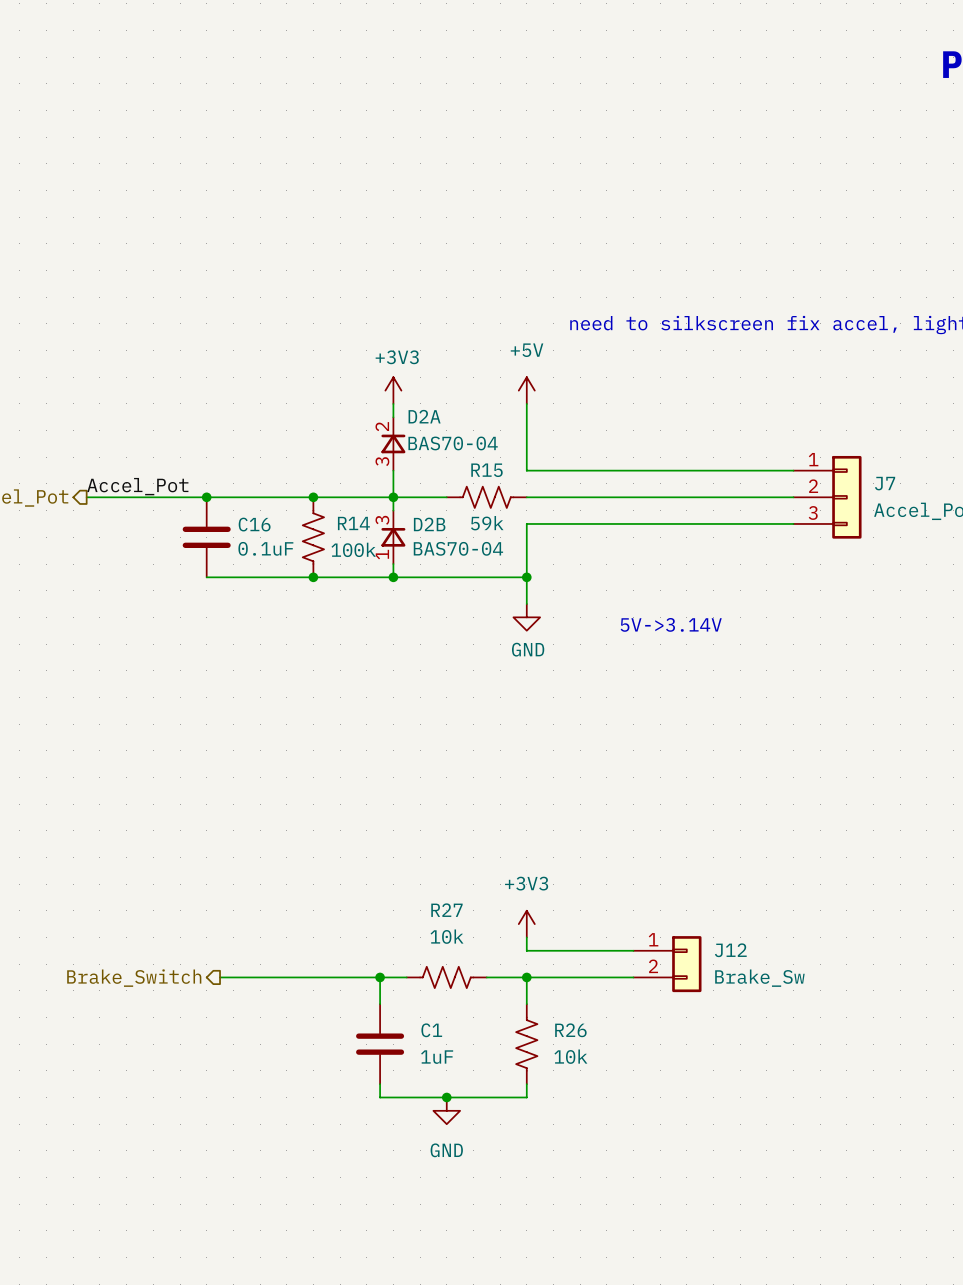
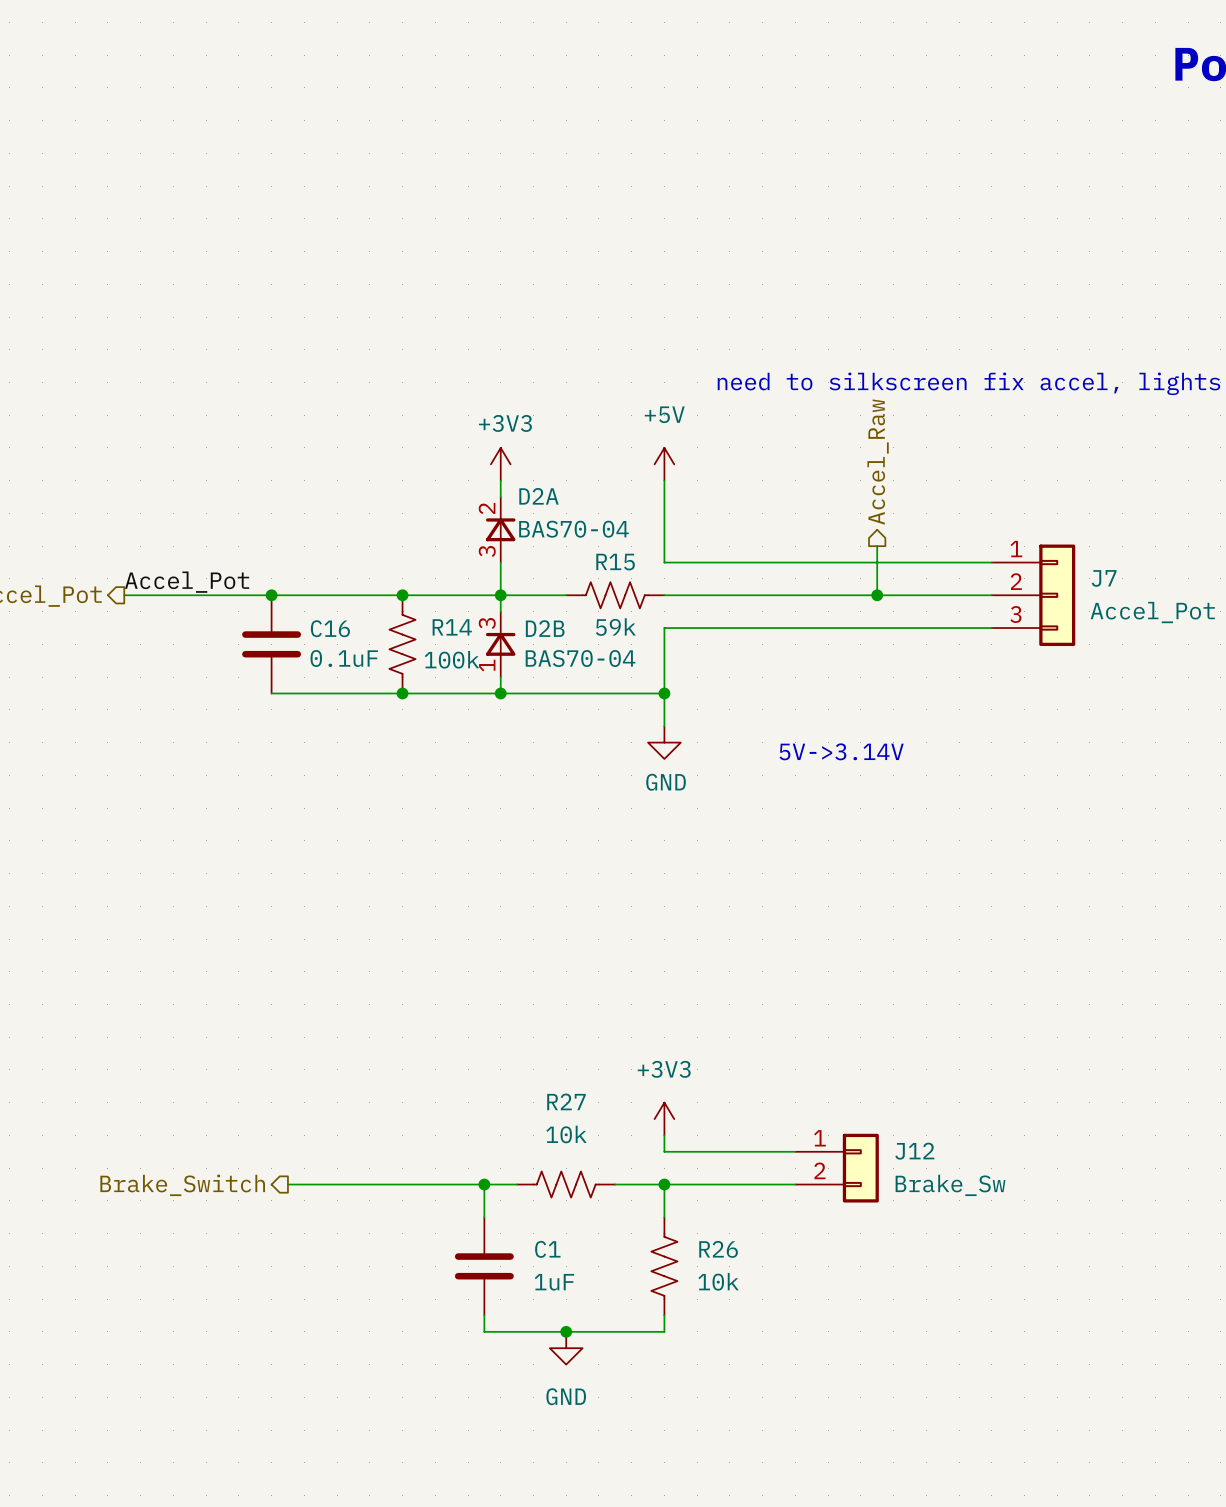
hierarchical label: none -> Accel_Raw (878, 462)
wire: none -> (877, 546) (877, 595)
junction: none -> (877, 595)

